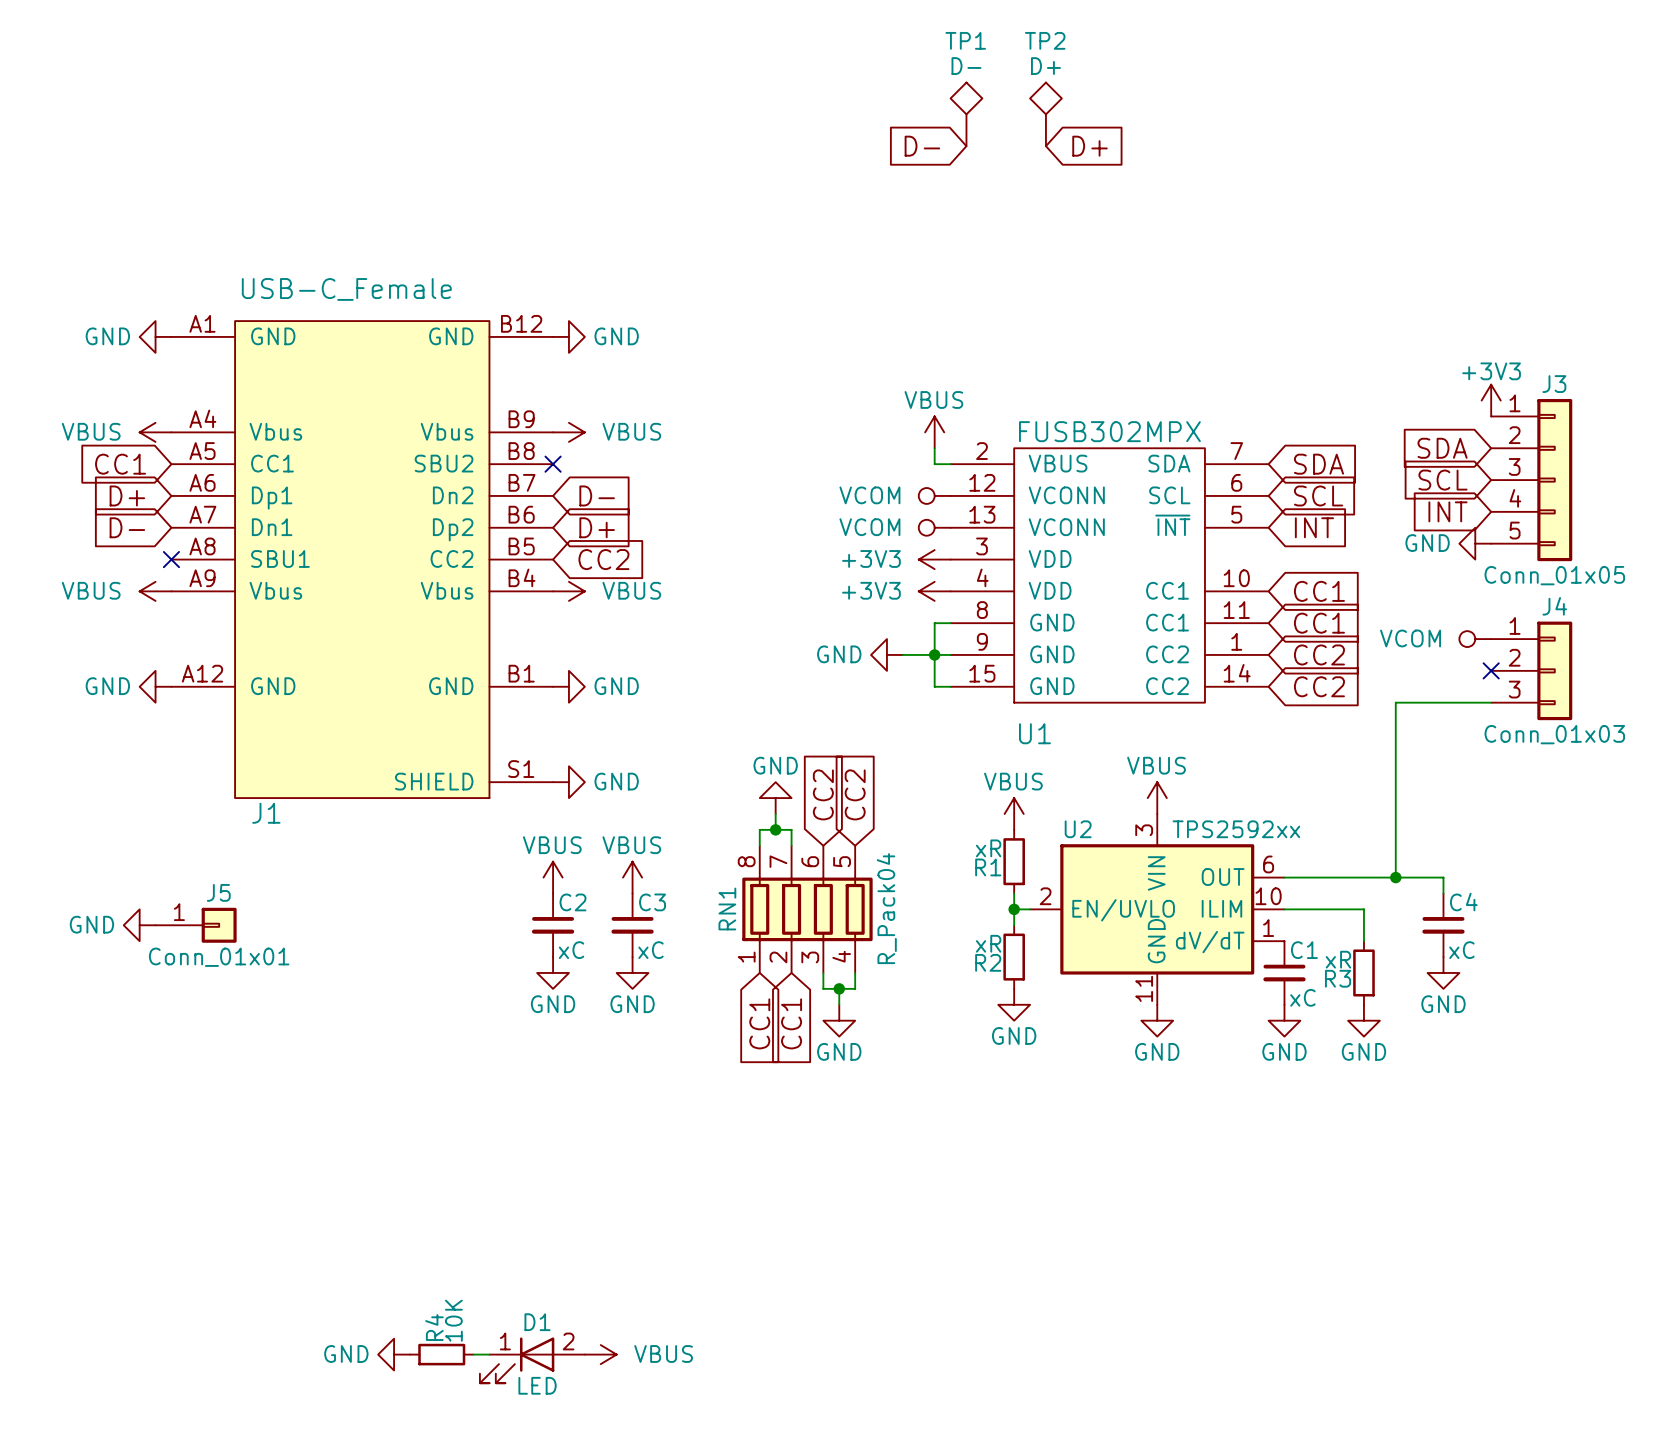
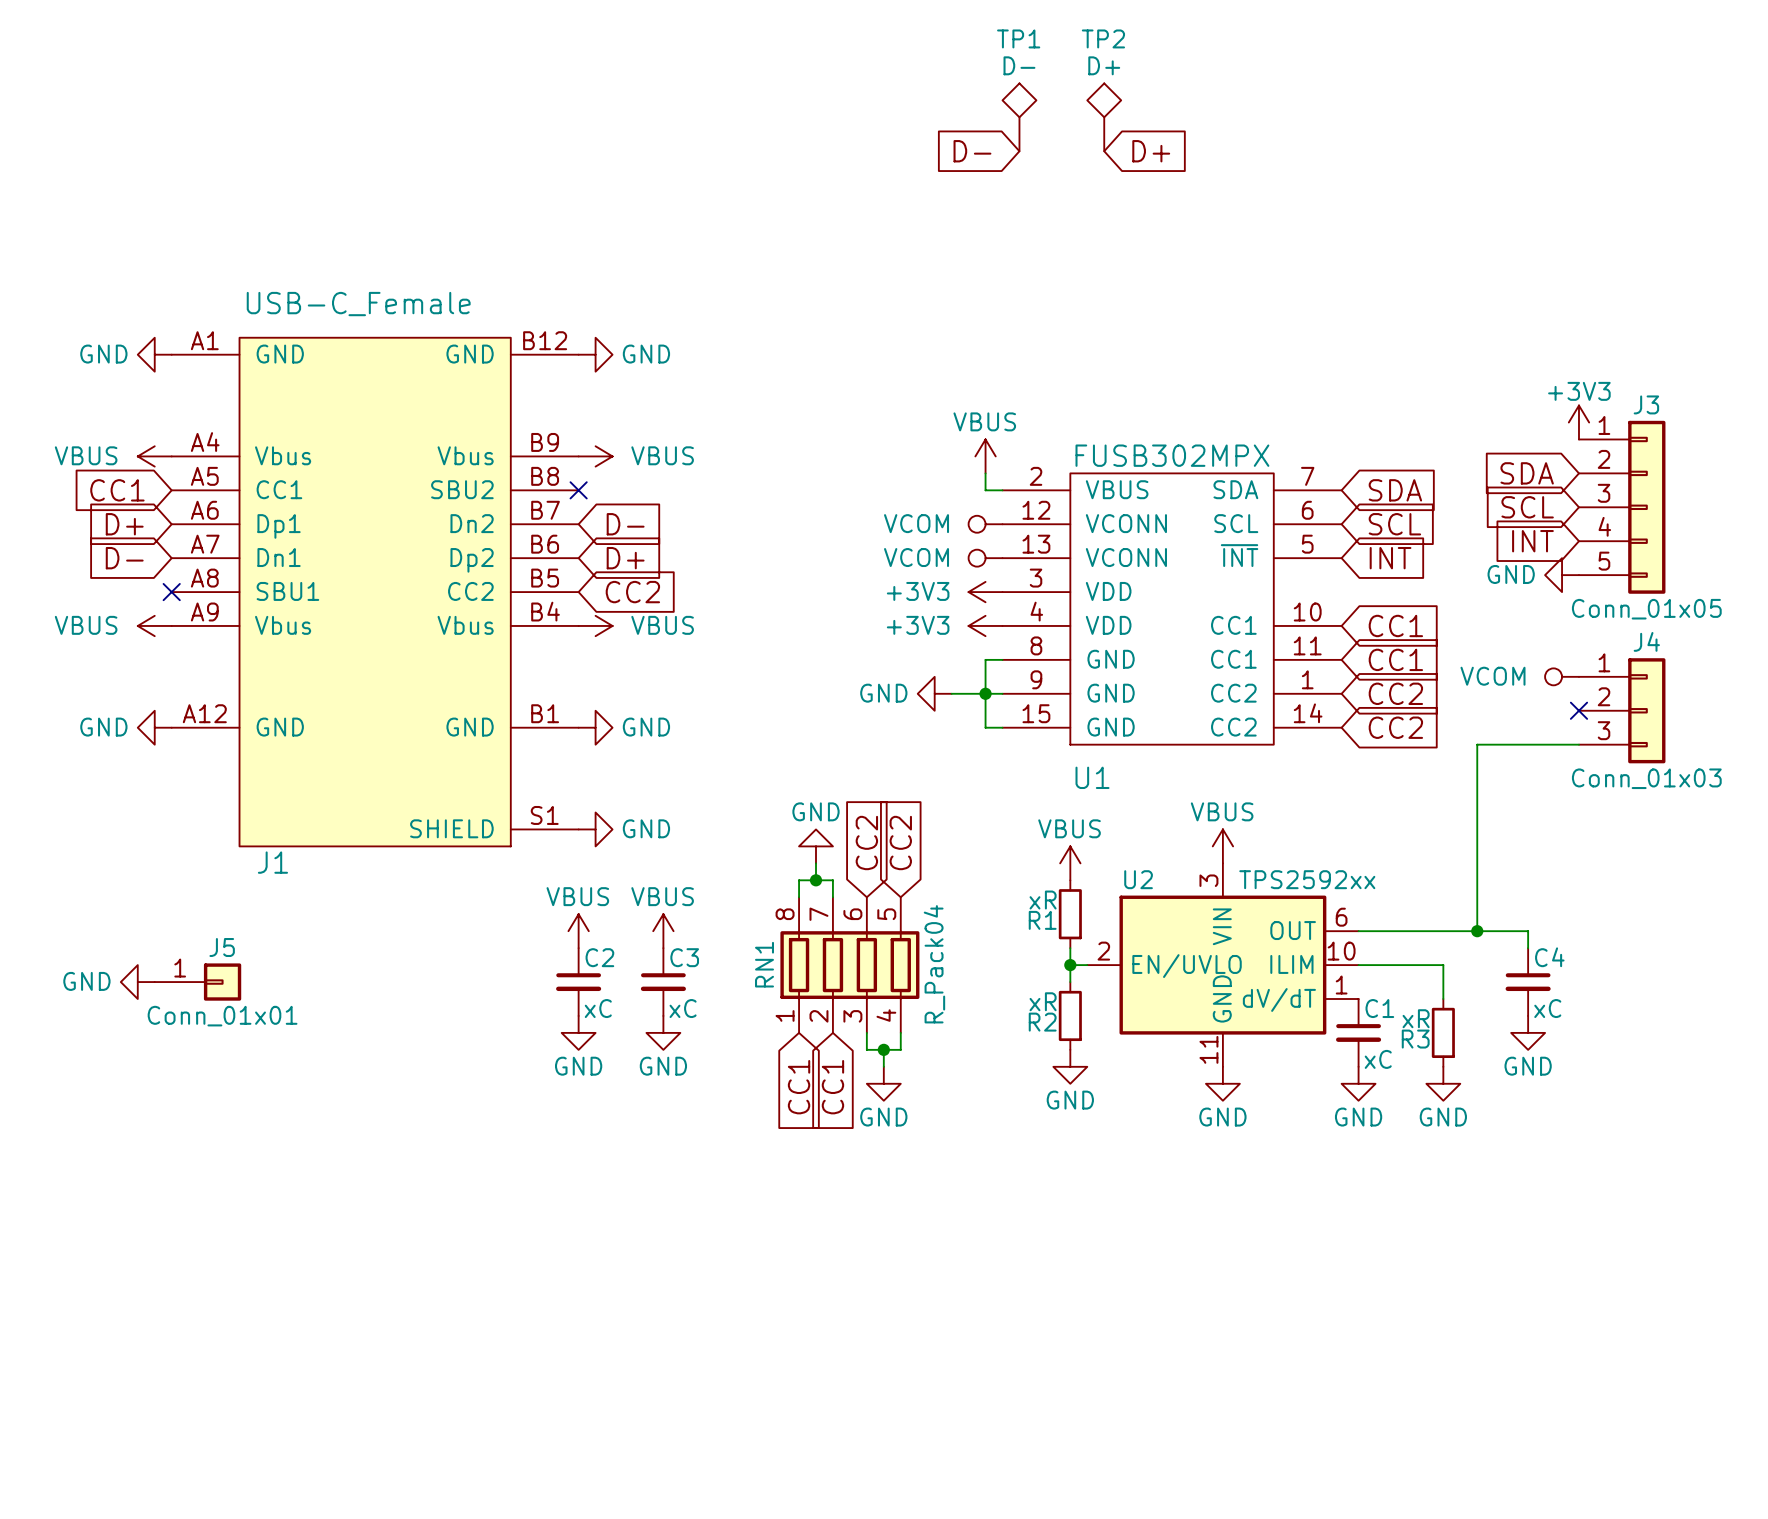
power symbol: GND (394, 1354) -> none
R4: 10K (441, 1354) -> none
wire: (473, 1354) (489, 1354) -> none
power symbol: VBUS (600, 1354) -> none
D1: LED (532, 1360) -> none

